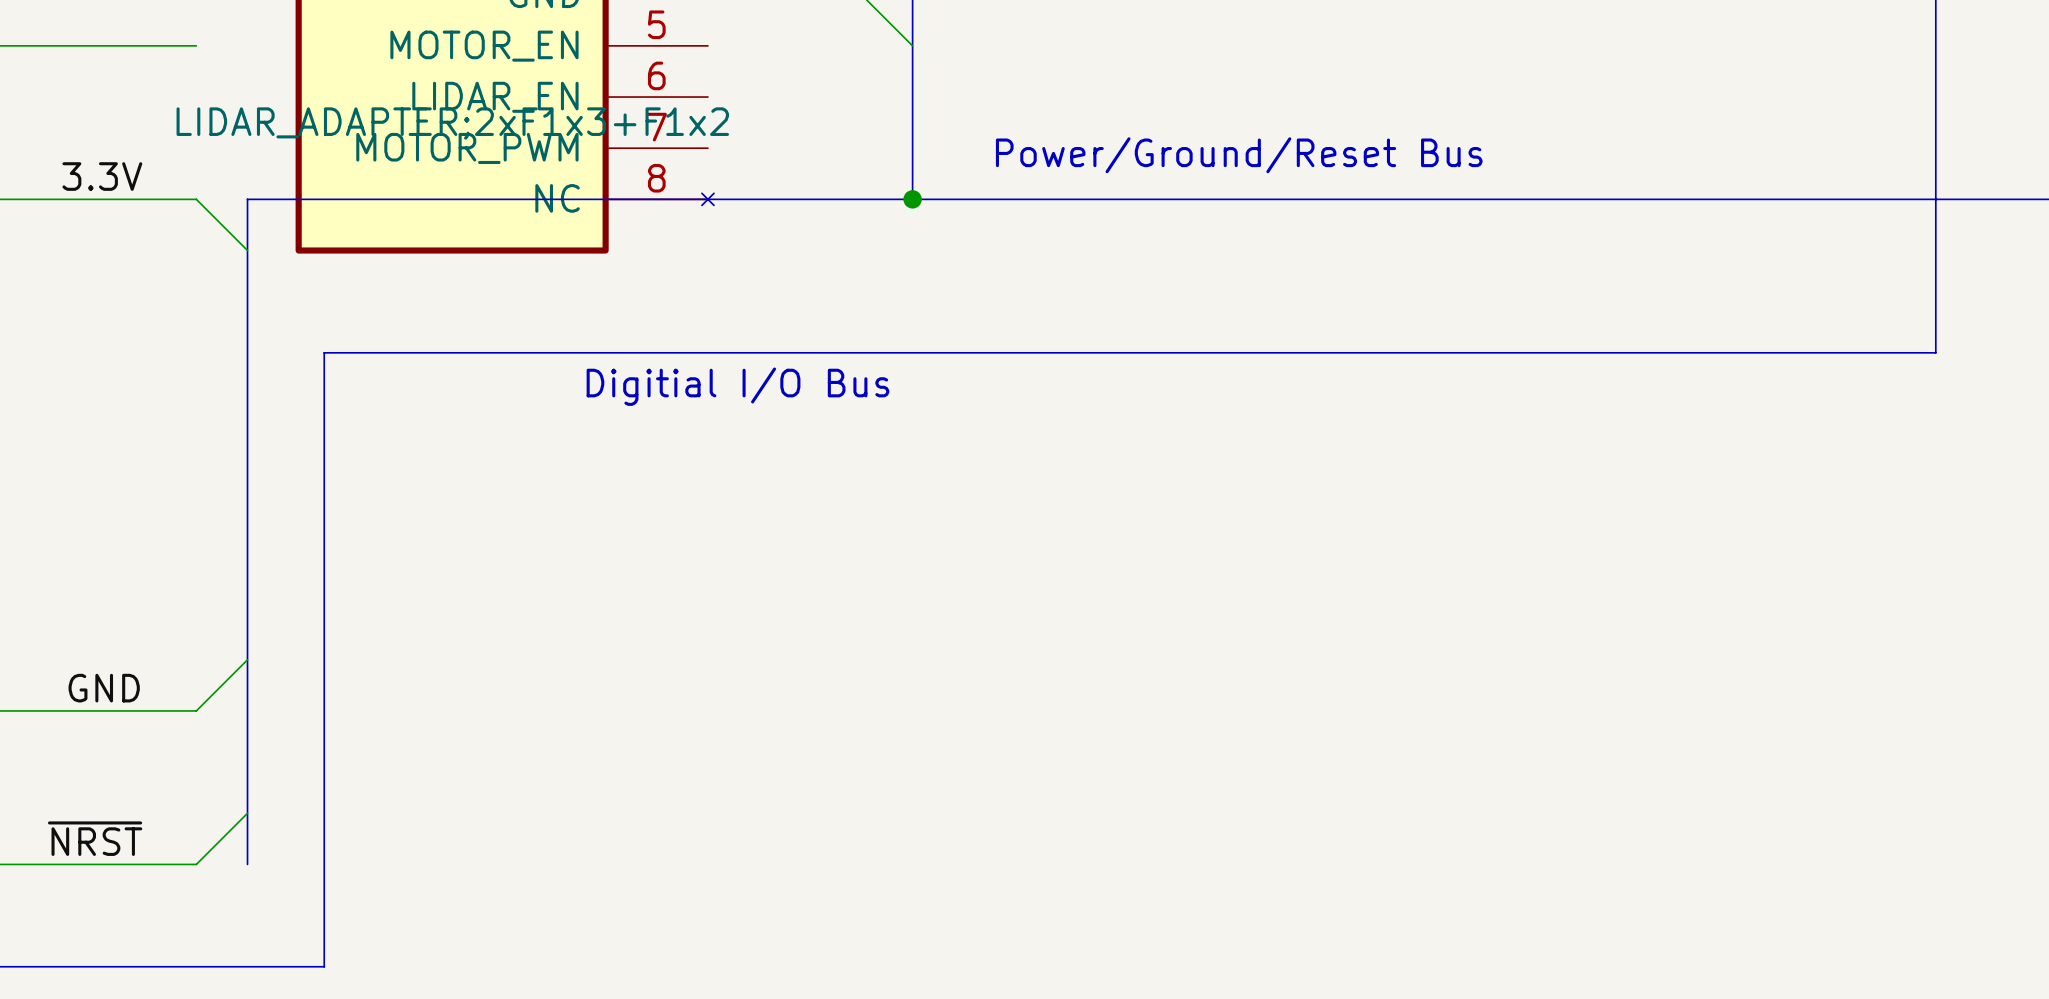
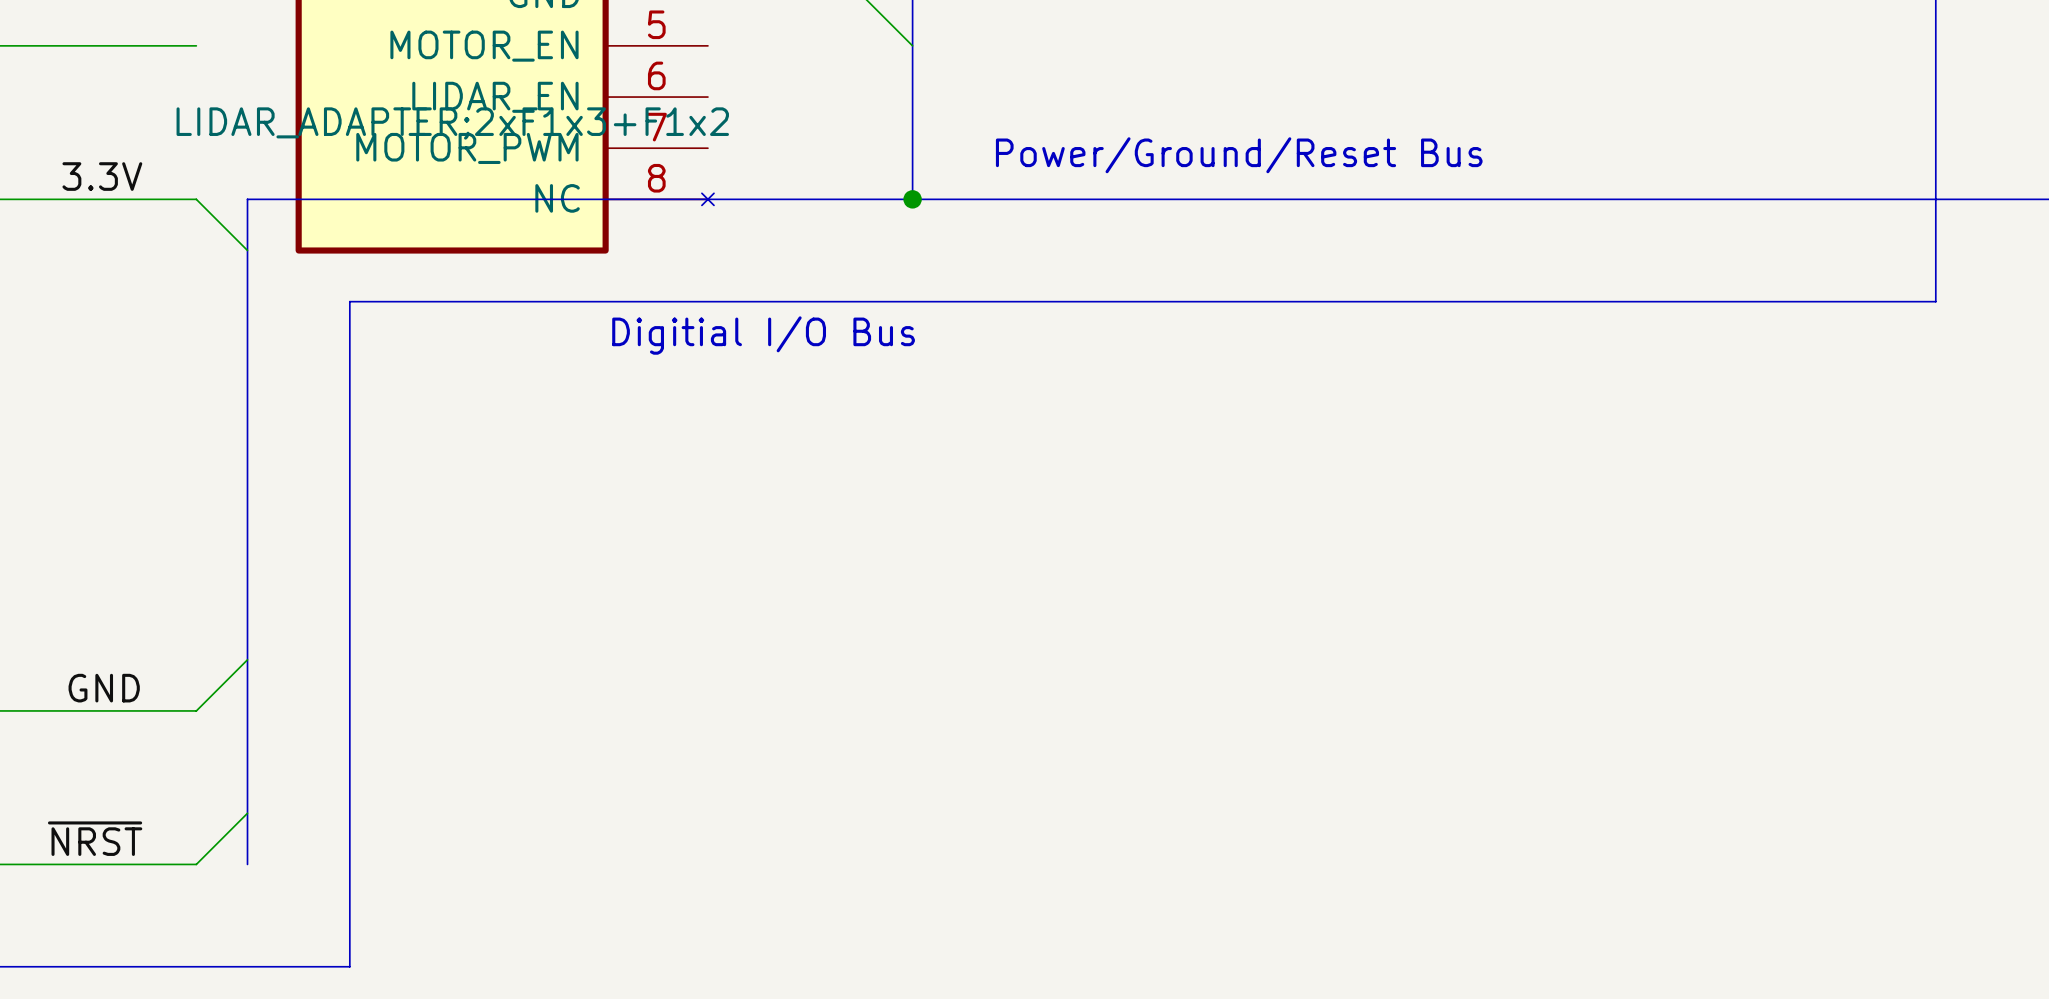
bus: (1935, 301) (1935, 352) (324, 352) (324, 966) -> (1935, 301) (349, 301) (349, 966) (324, 966)
text position: Digitial I/O Bus (737, 386) -> Digitial I/O Bus (763, 335)

